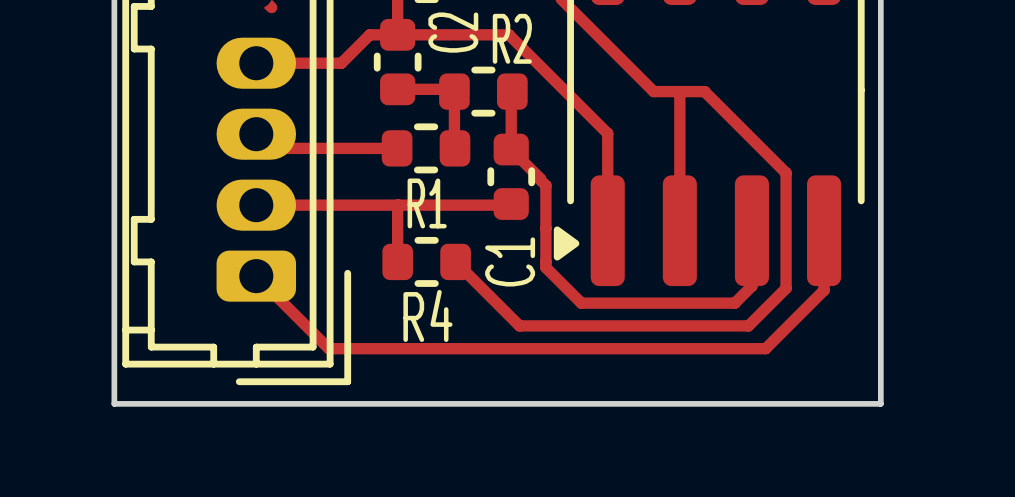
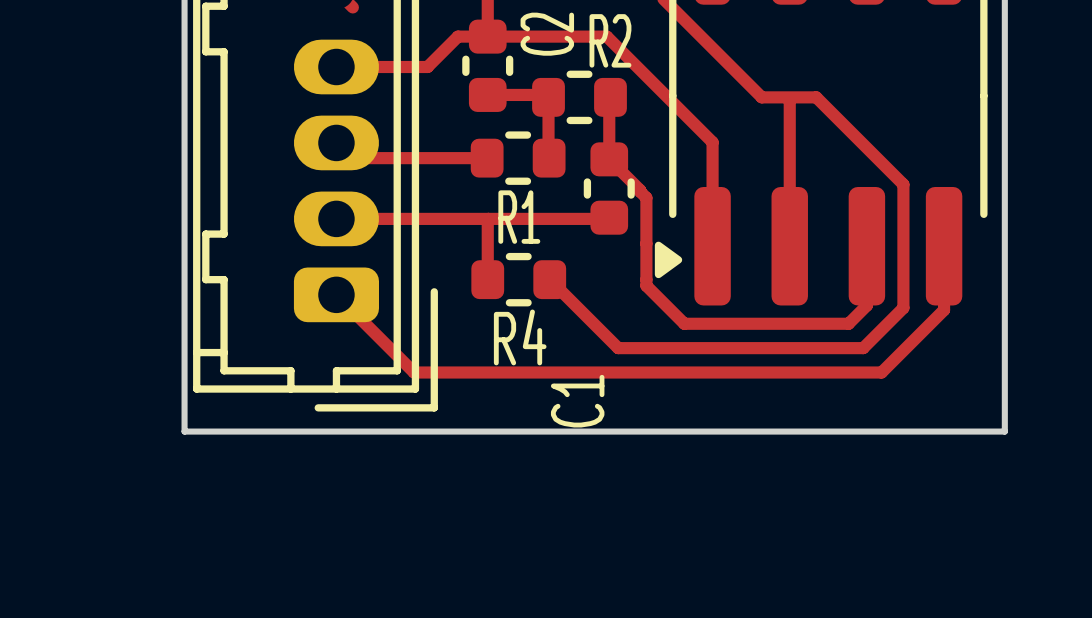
C1 name position: C1 (510, 261) -> C1 (577, 401)

